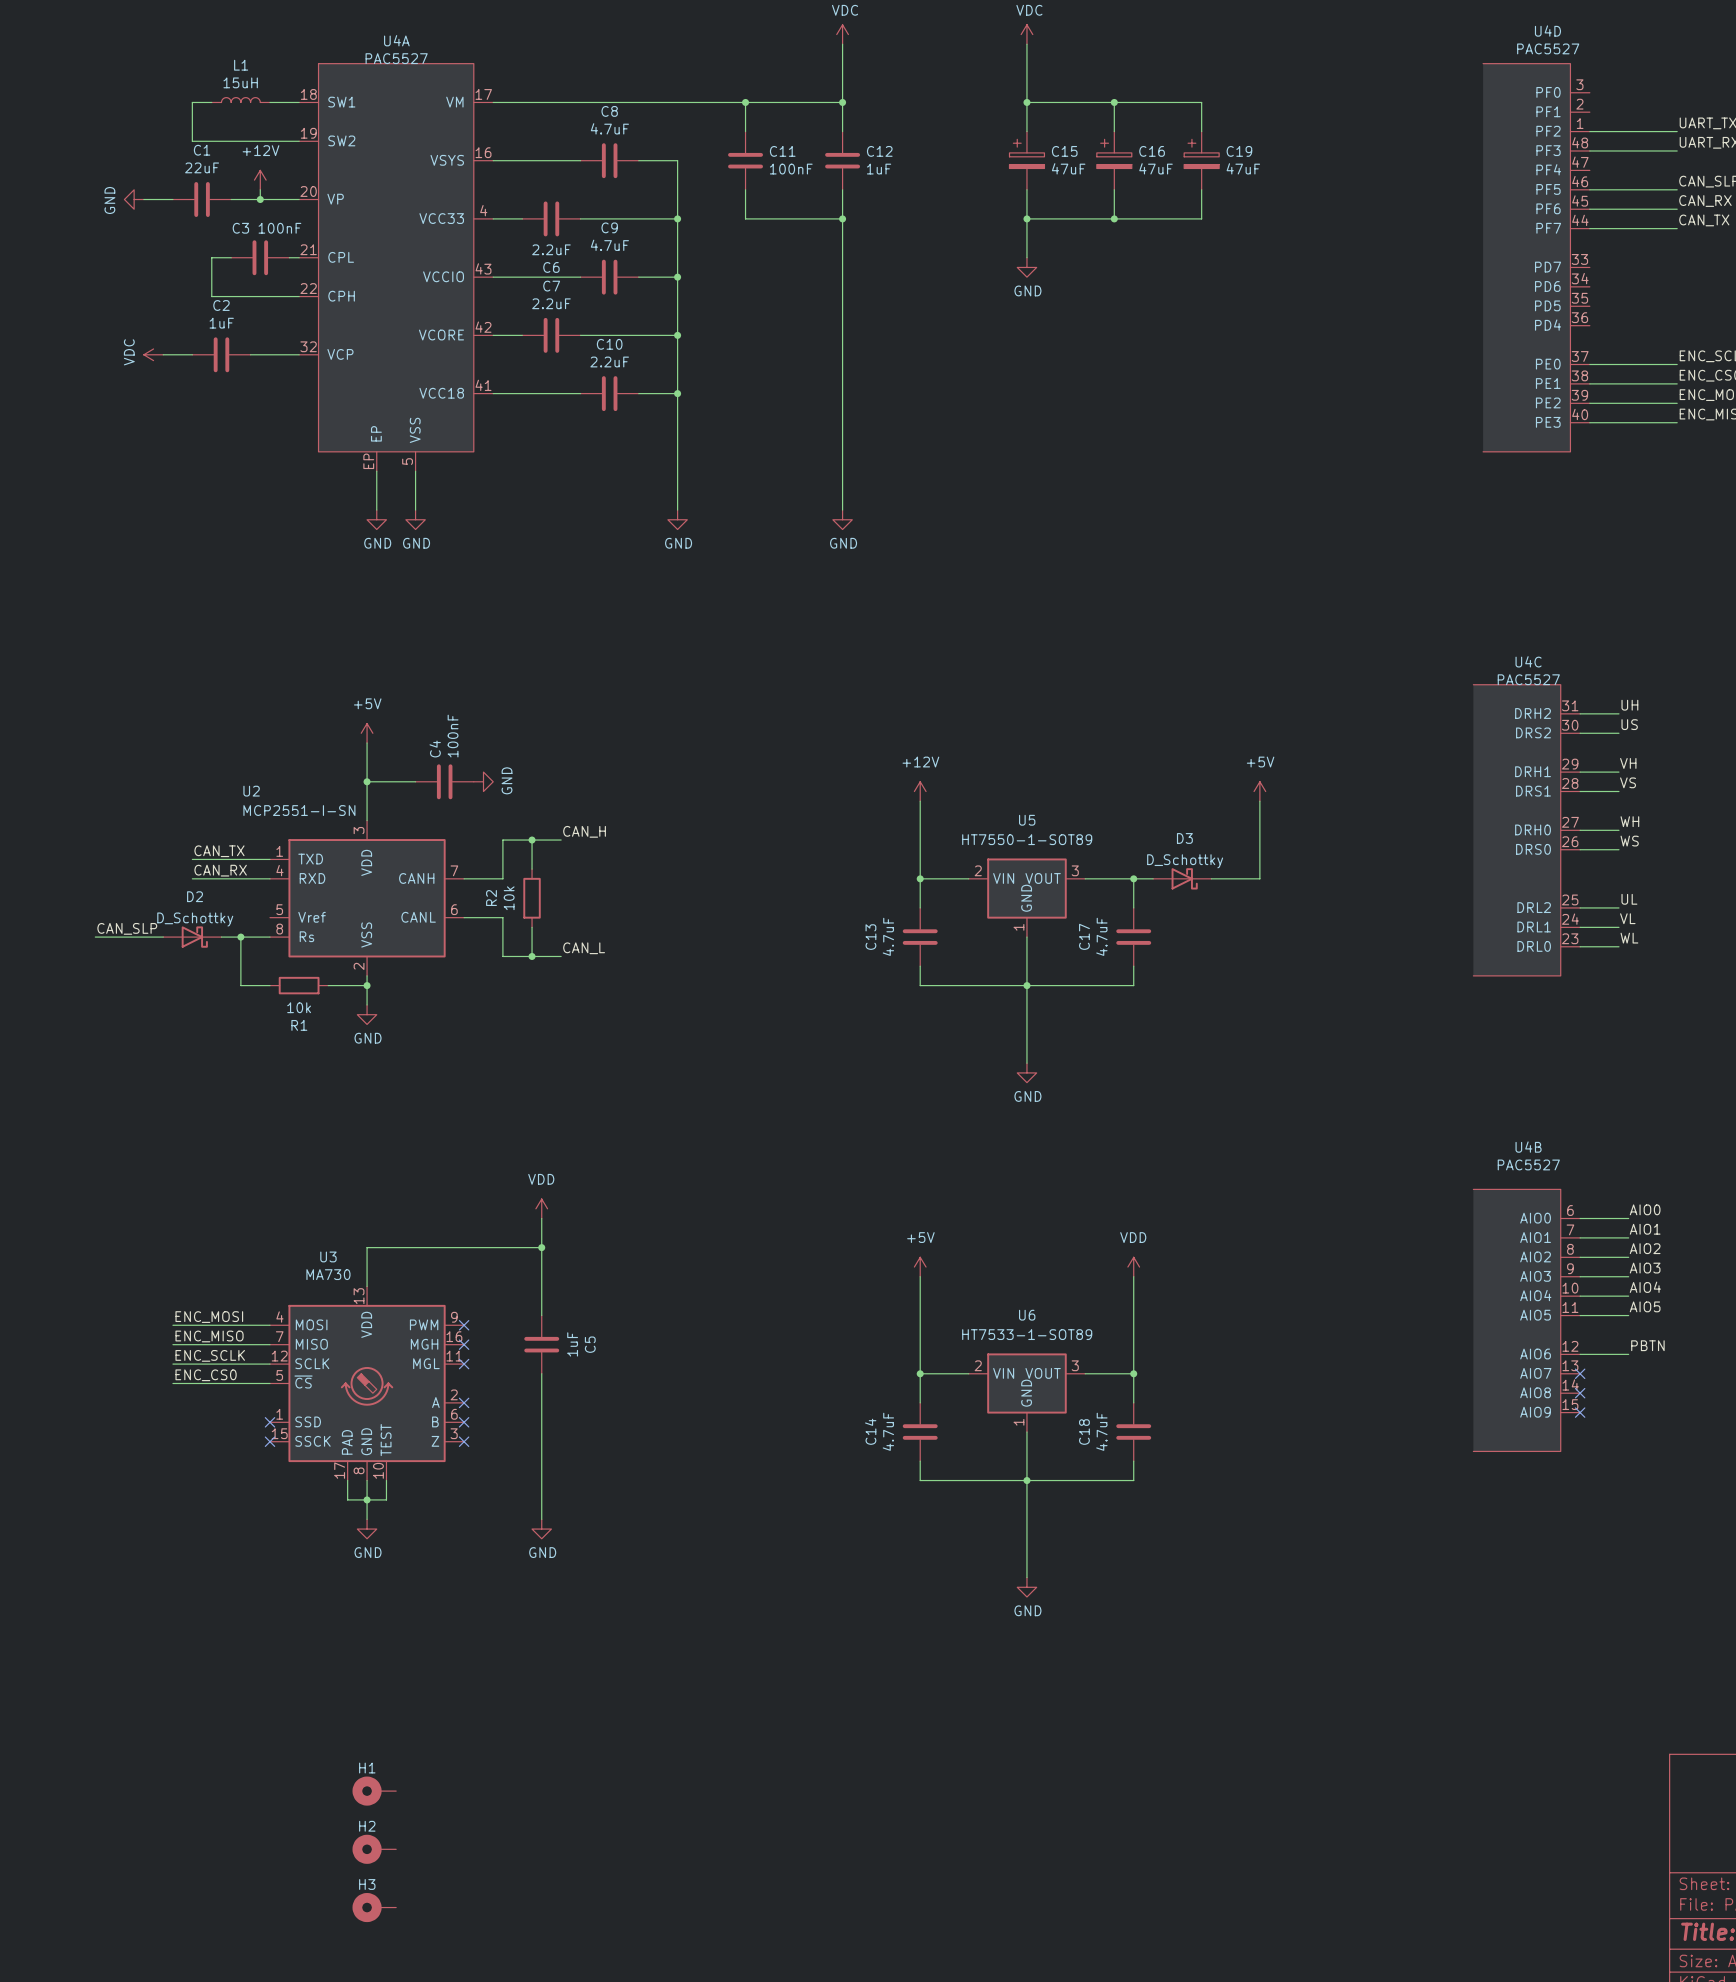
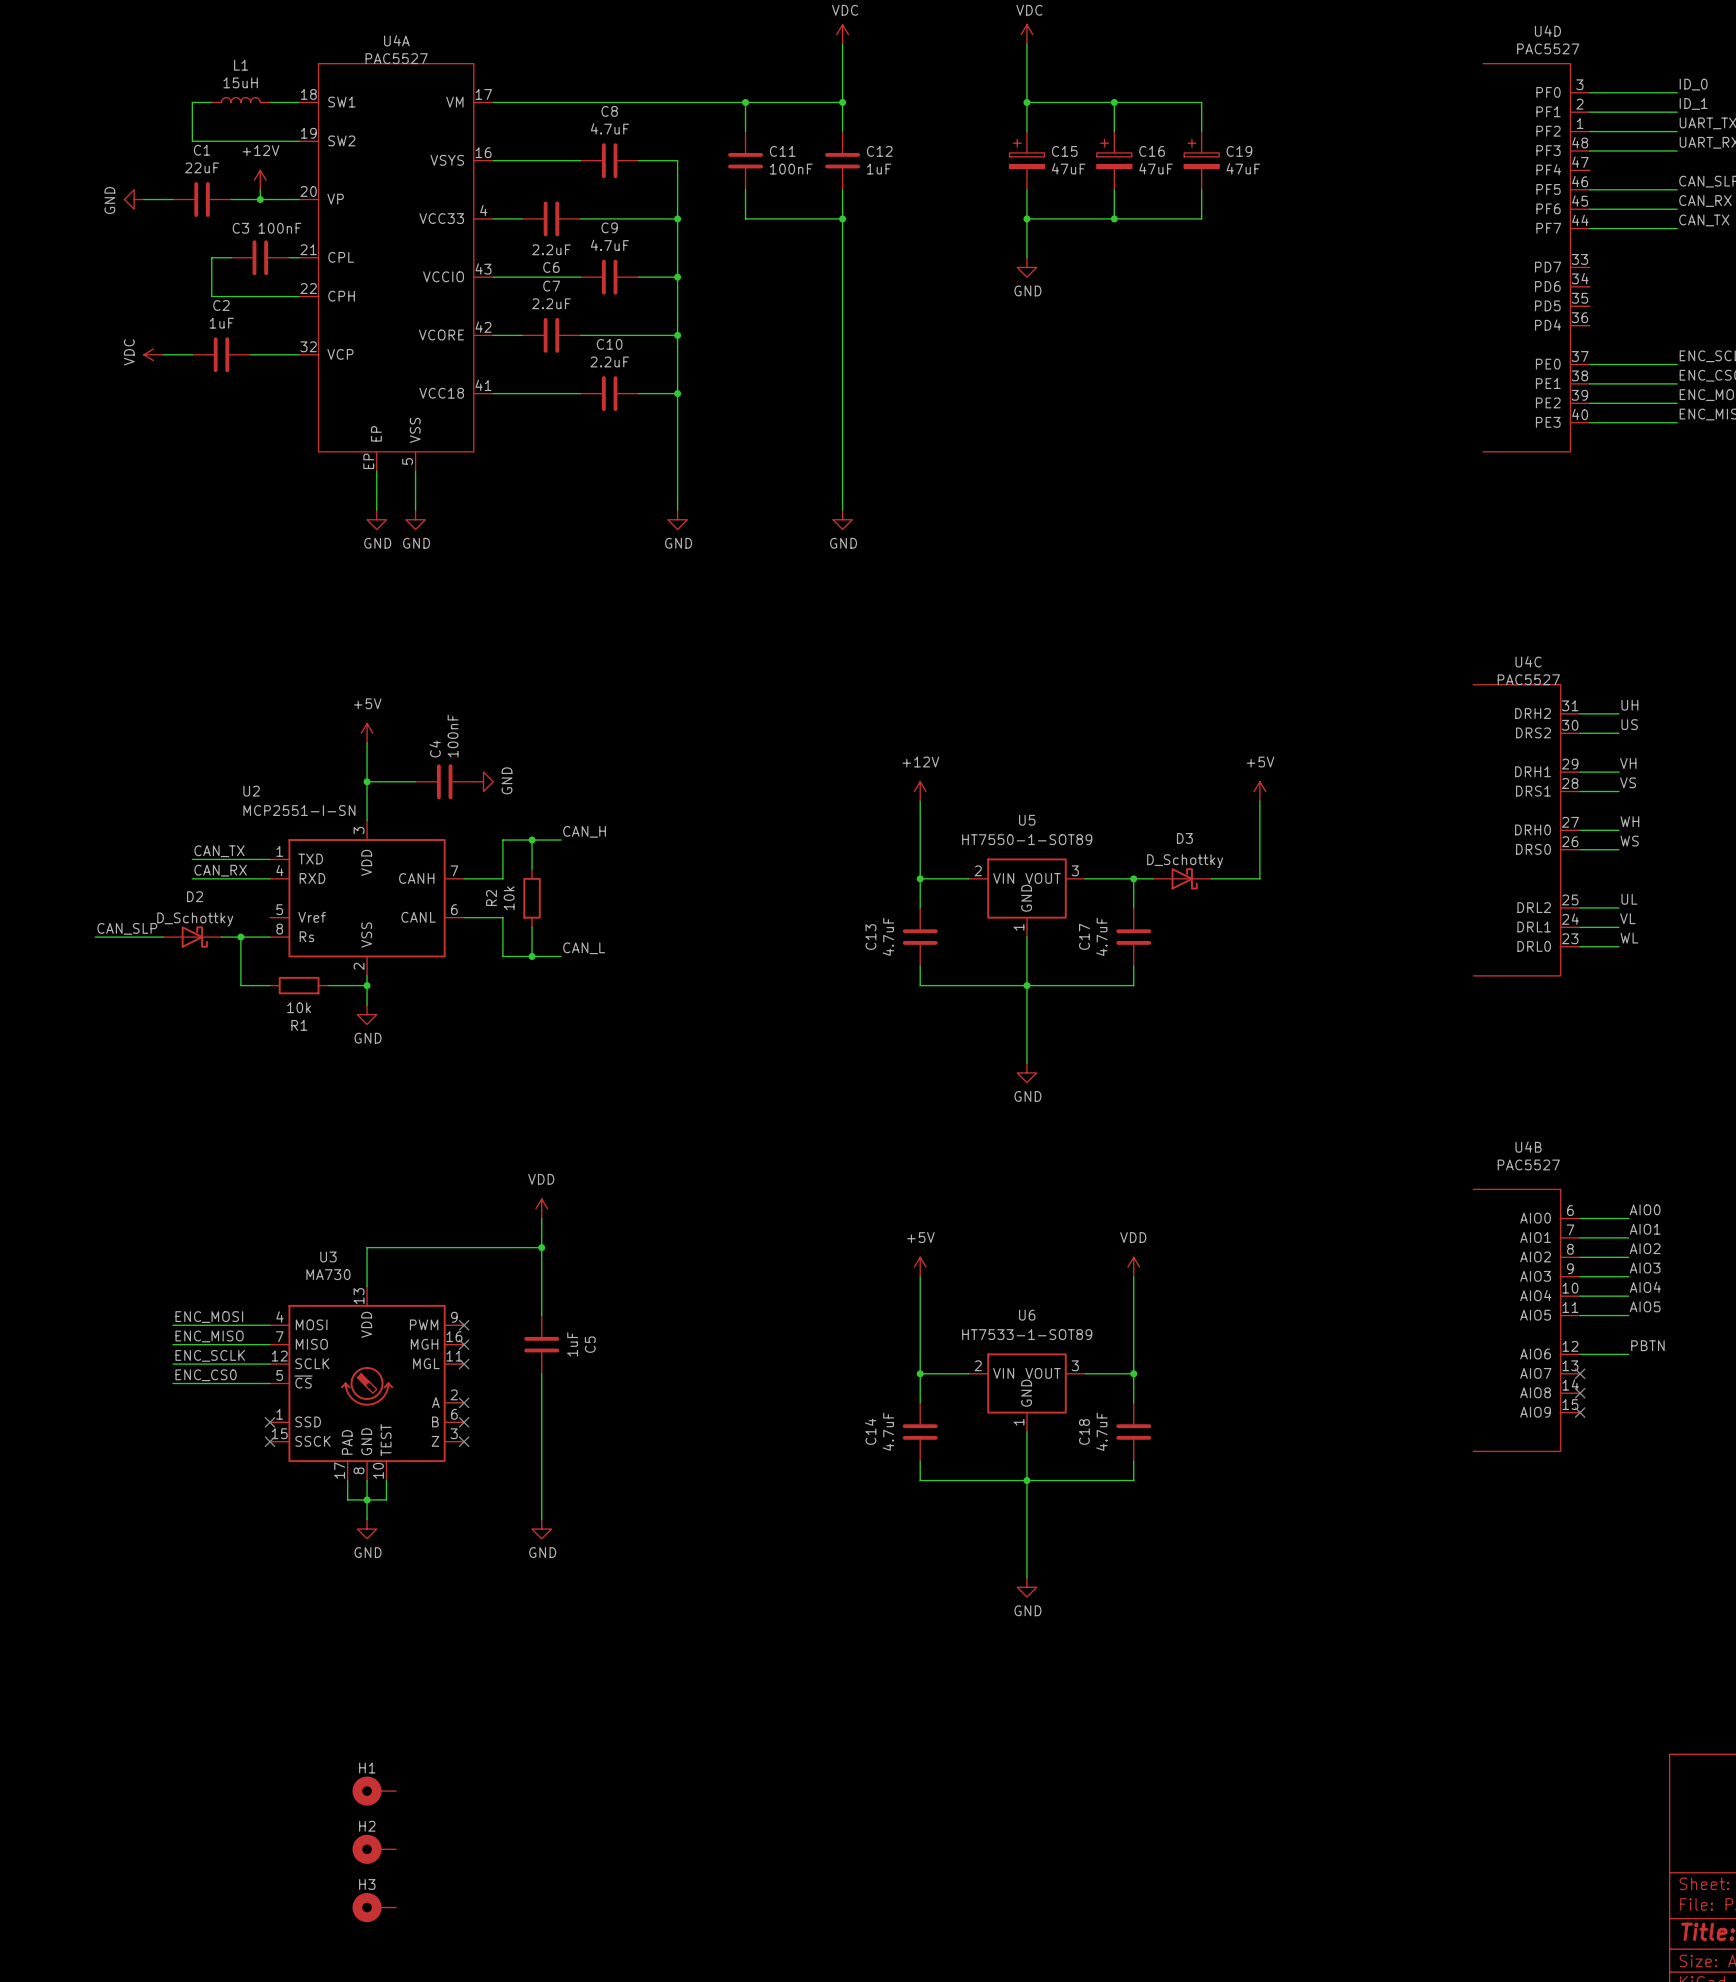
label: none -> ID_0 (1693, 84)
wire: none -> (1589, 92) (1677, 92)
label: none -> ID_1 (1693, 103)
wire: none -> (1589, 112) (1677, 112)

